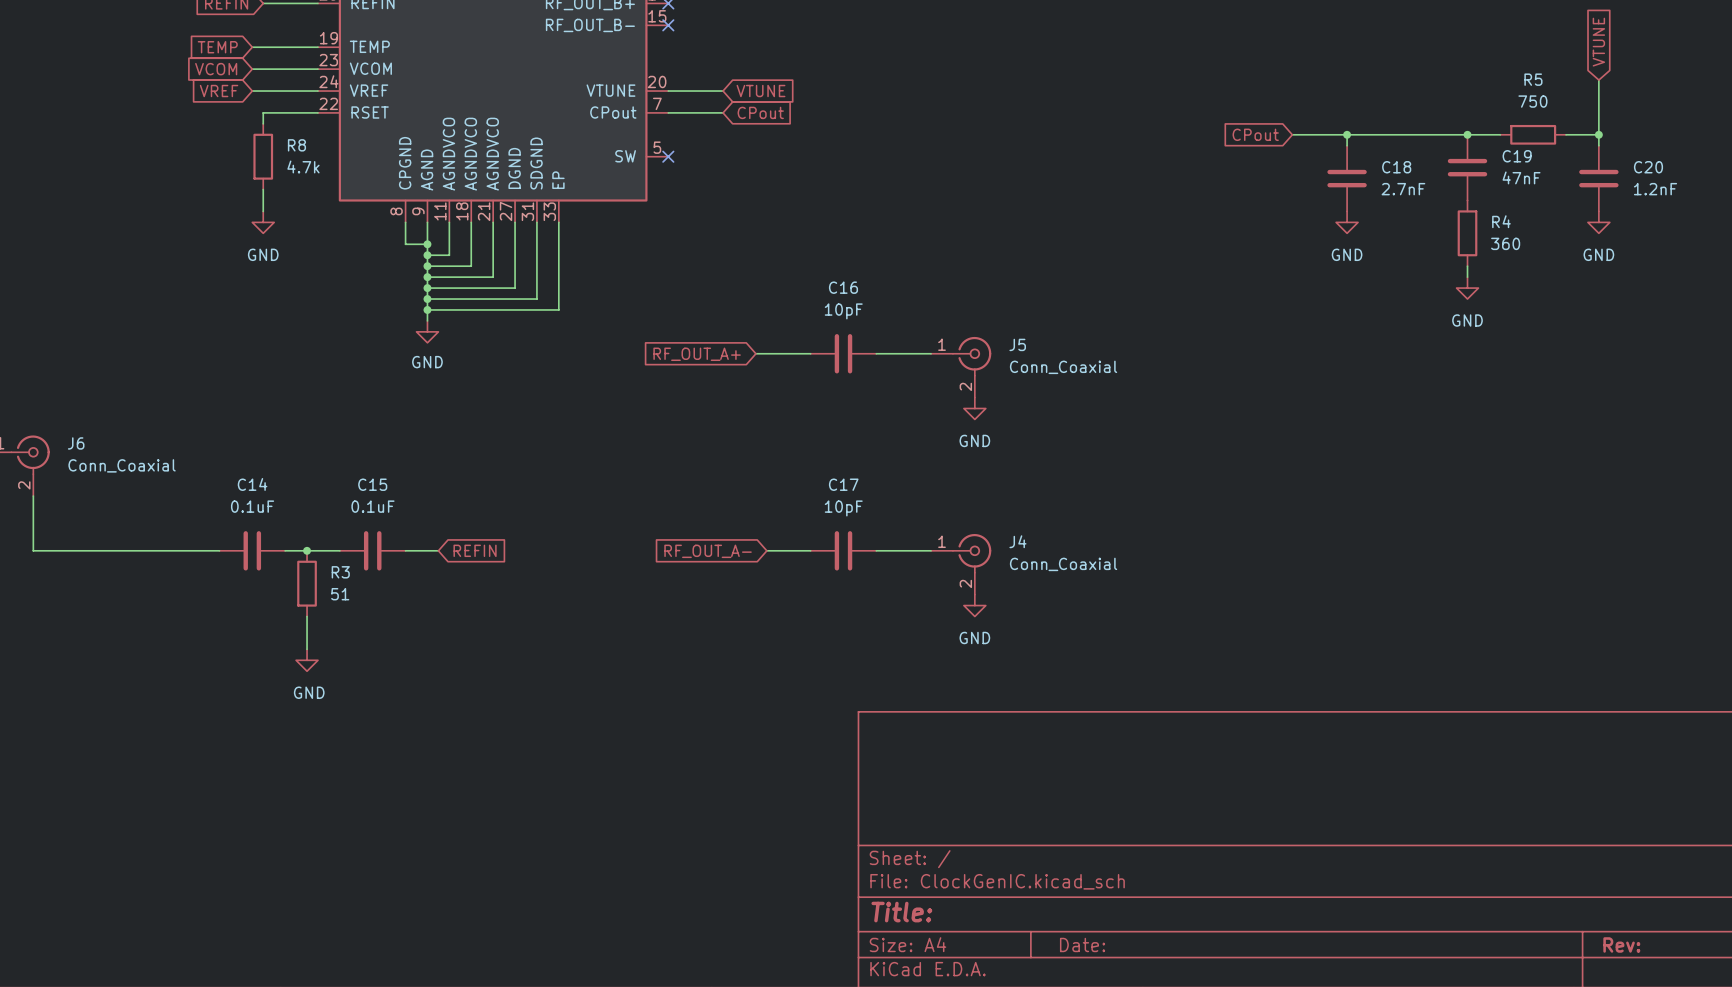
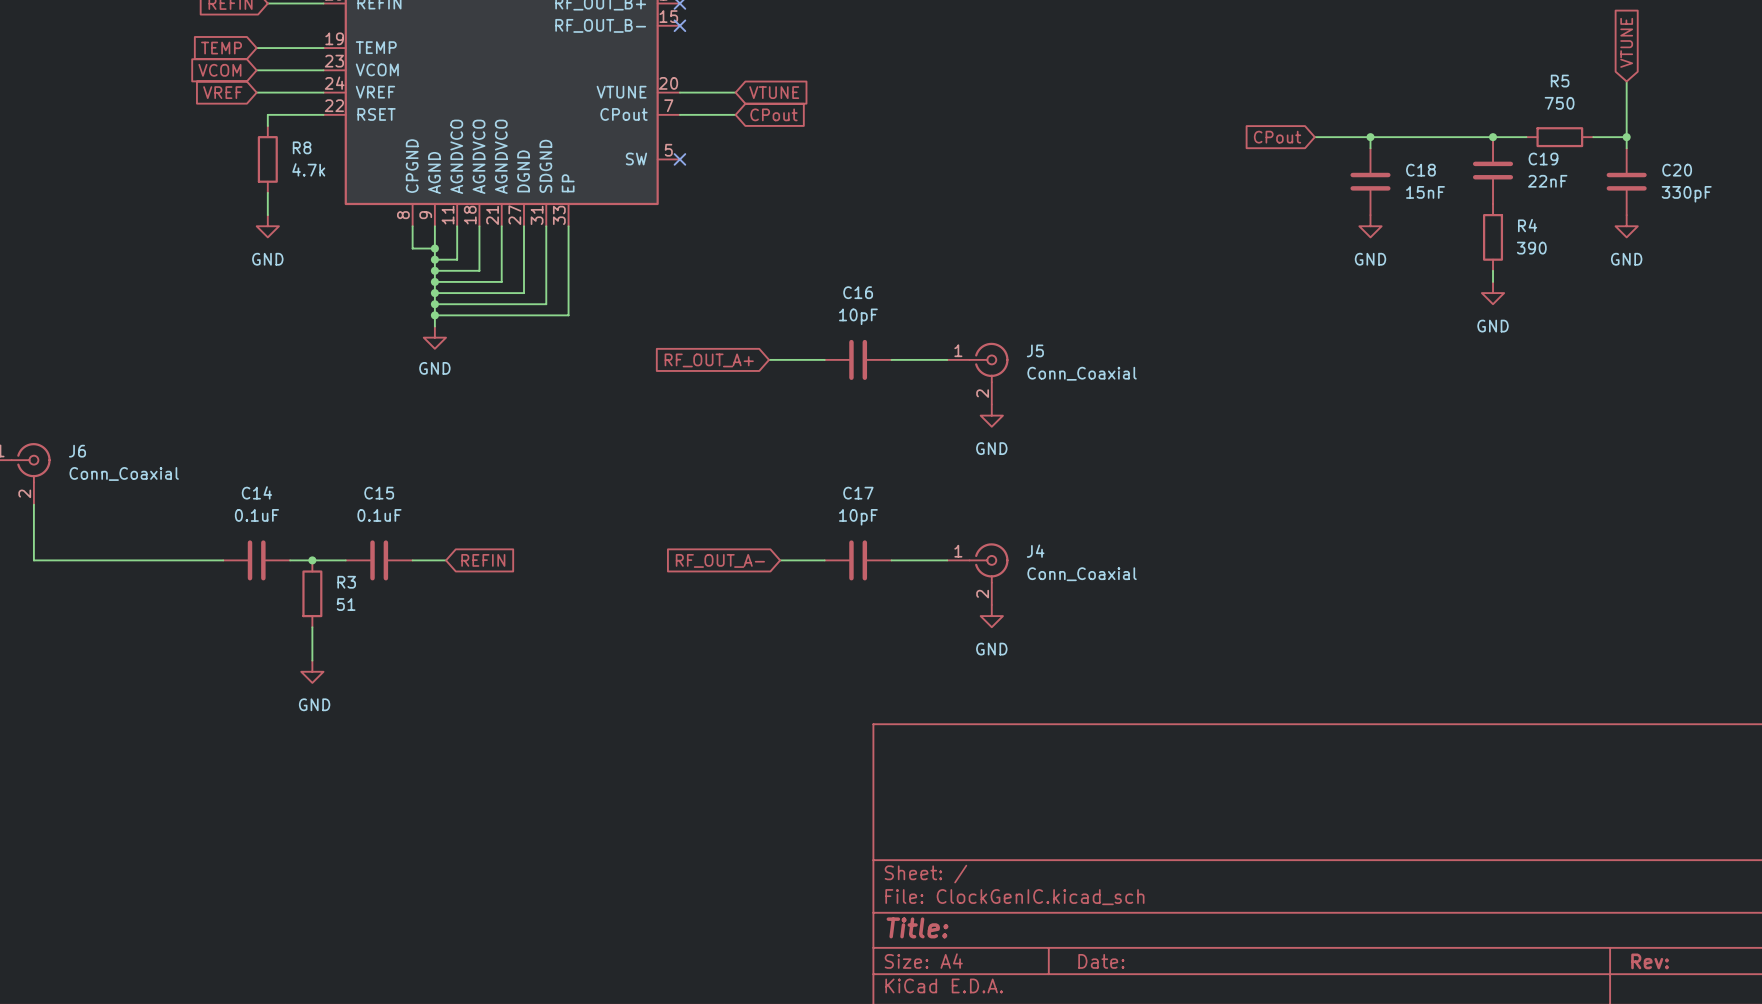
C19 value: 47nF (1521, 177) -> 22nF (1547, 181)
C18 value: 2.7nF (1403, 189) -> 15nF (1425, 192)
C20 value: 1.2nF (1655, 189) -> 330pF (1686, 194)
R4 value: 360 (1505, 243) -> 390 (1531, 248)

